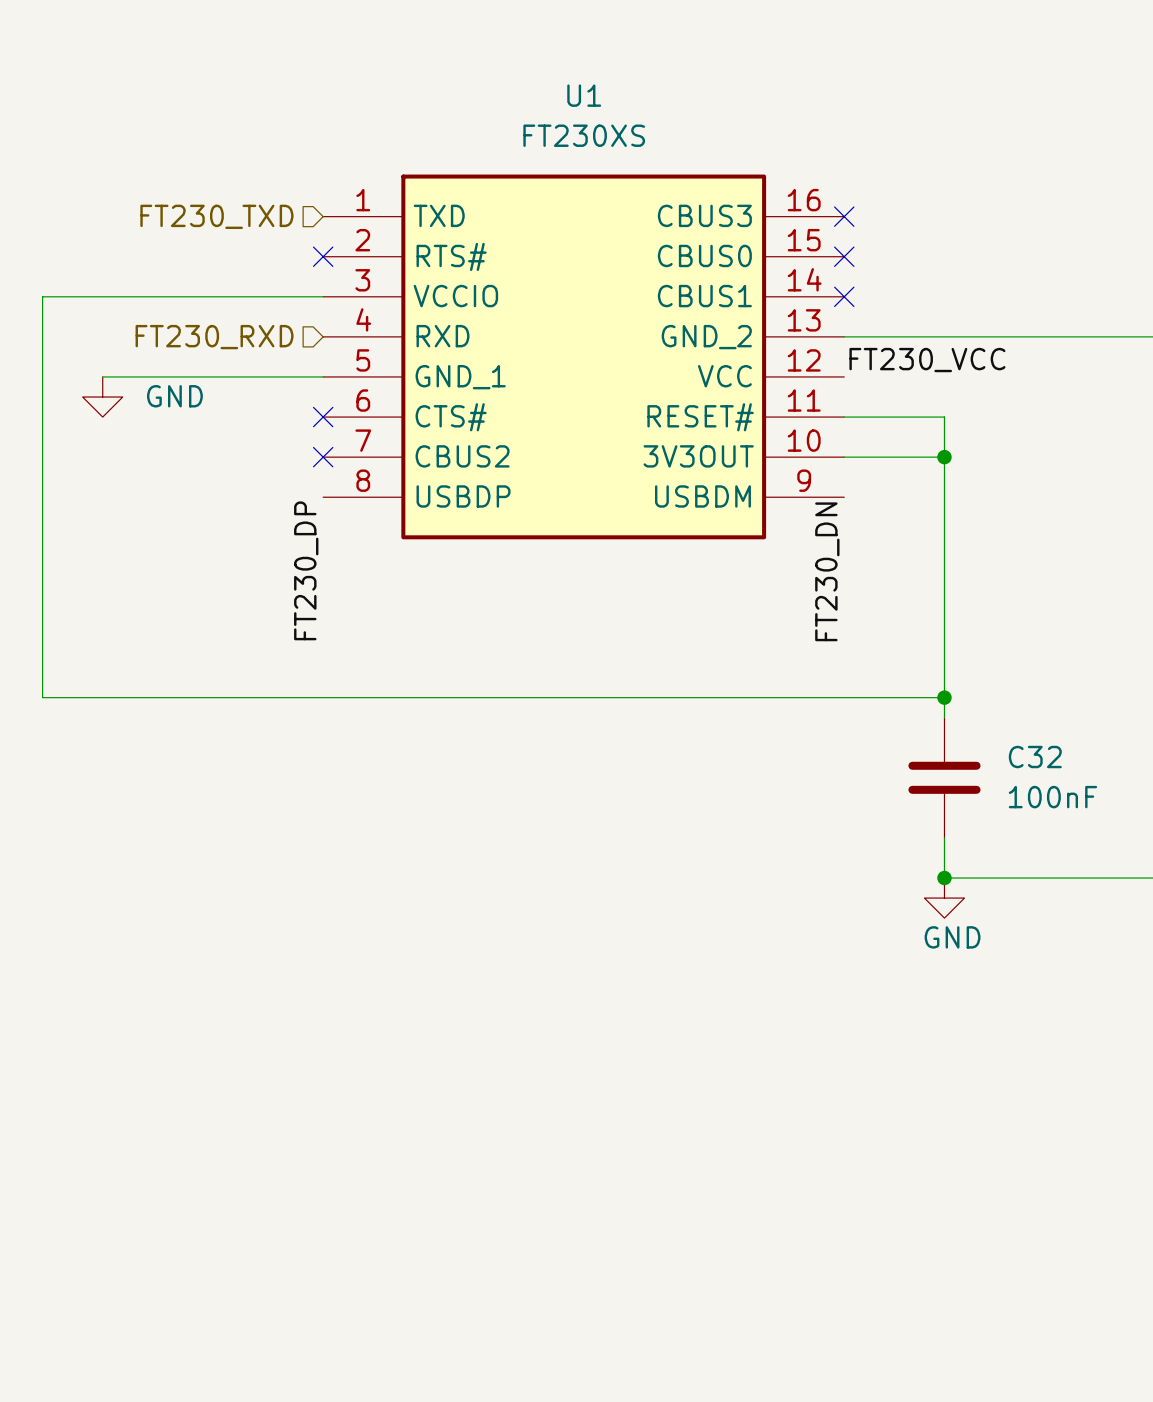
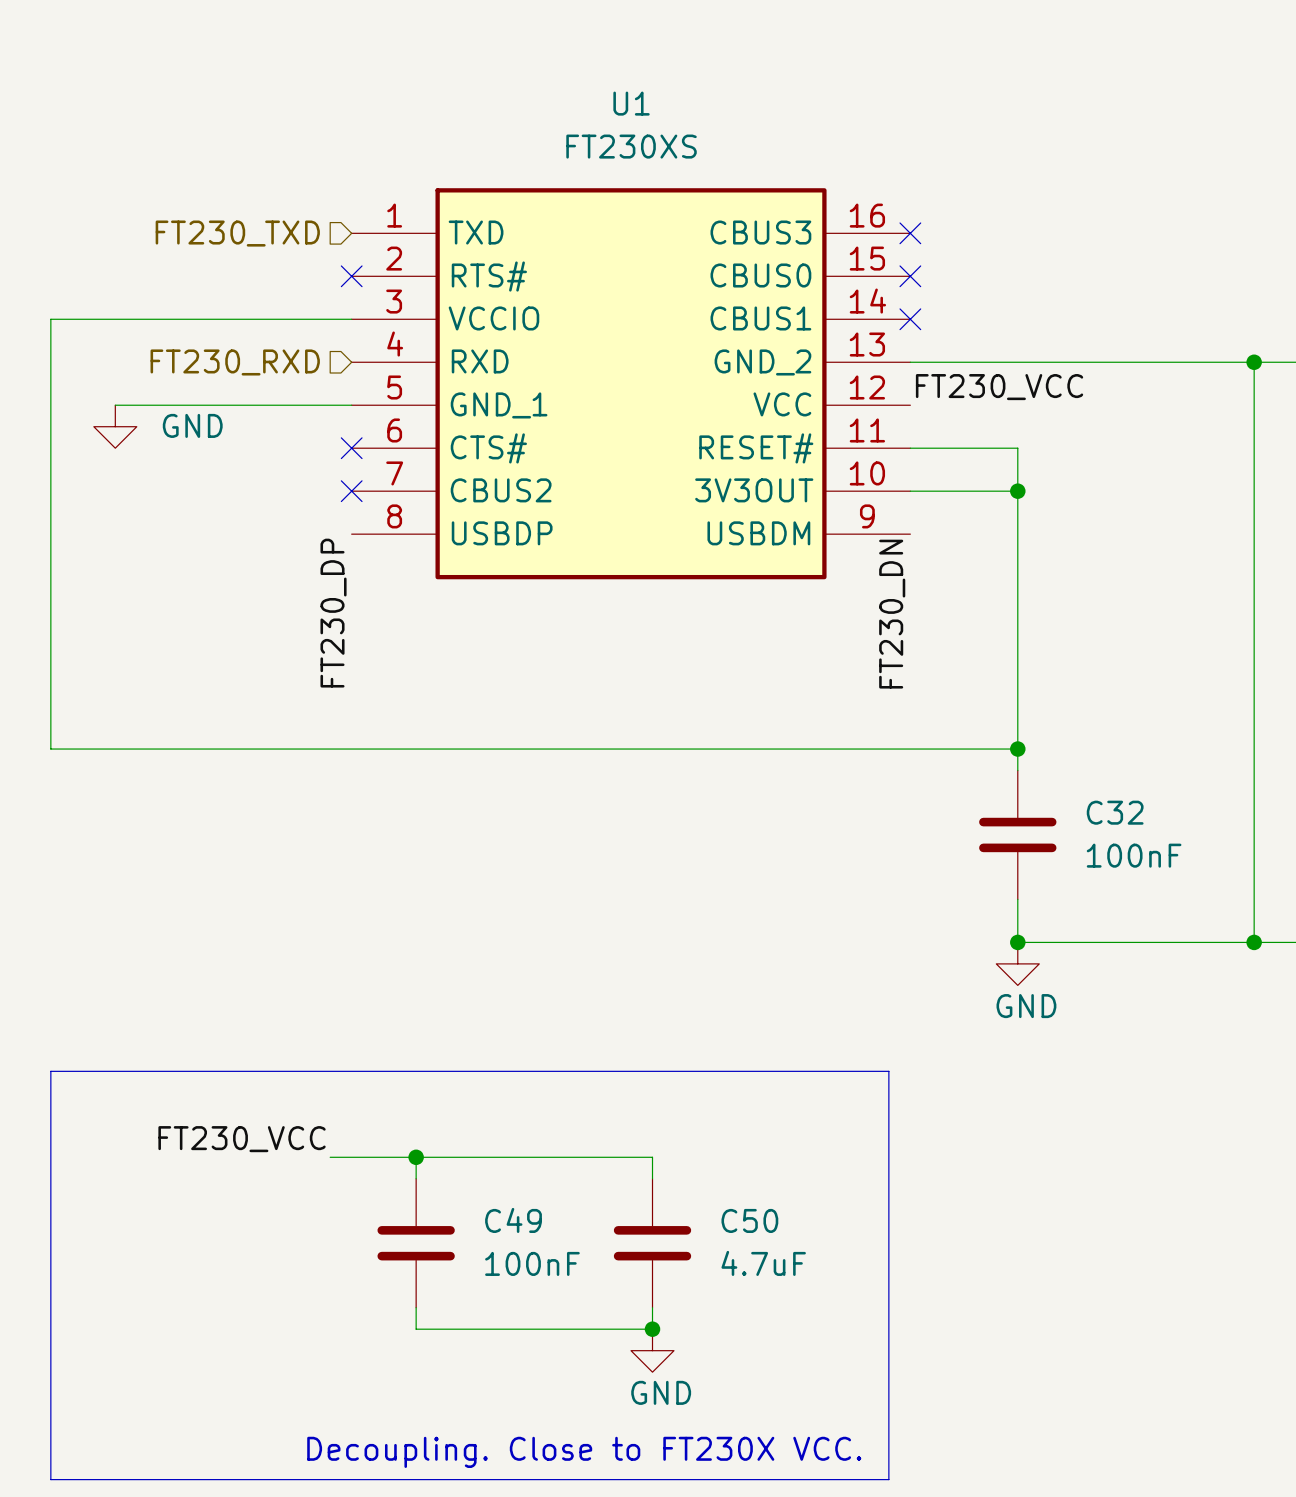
line: none -> (50, 1071) (888, 1071) (888, 1479) (50, 1479) (50, 1071)
label: none -> FT230_VCC (242, 1139)
wire: none -> (330, 1157) (652, 1157) (652, 1178)
wire: none -> (416, 1157) (416, 1178)
junction: none -> (416, 1157)
C49: none -> 100nF (416, 1243)
C50: none -> 4.7uF (652, 1243)
wire: none -> (416, 1307) (416, 1329) (652, 1329) (652, 1307)
junction: none -> (652, 1329)
power symbol: none -> GND (652, 1350)
text: none -> Decoupling. Close to FT230X VCC. (584, 1452)

